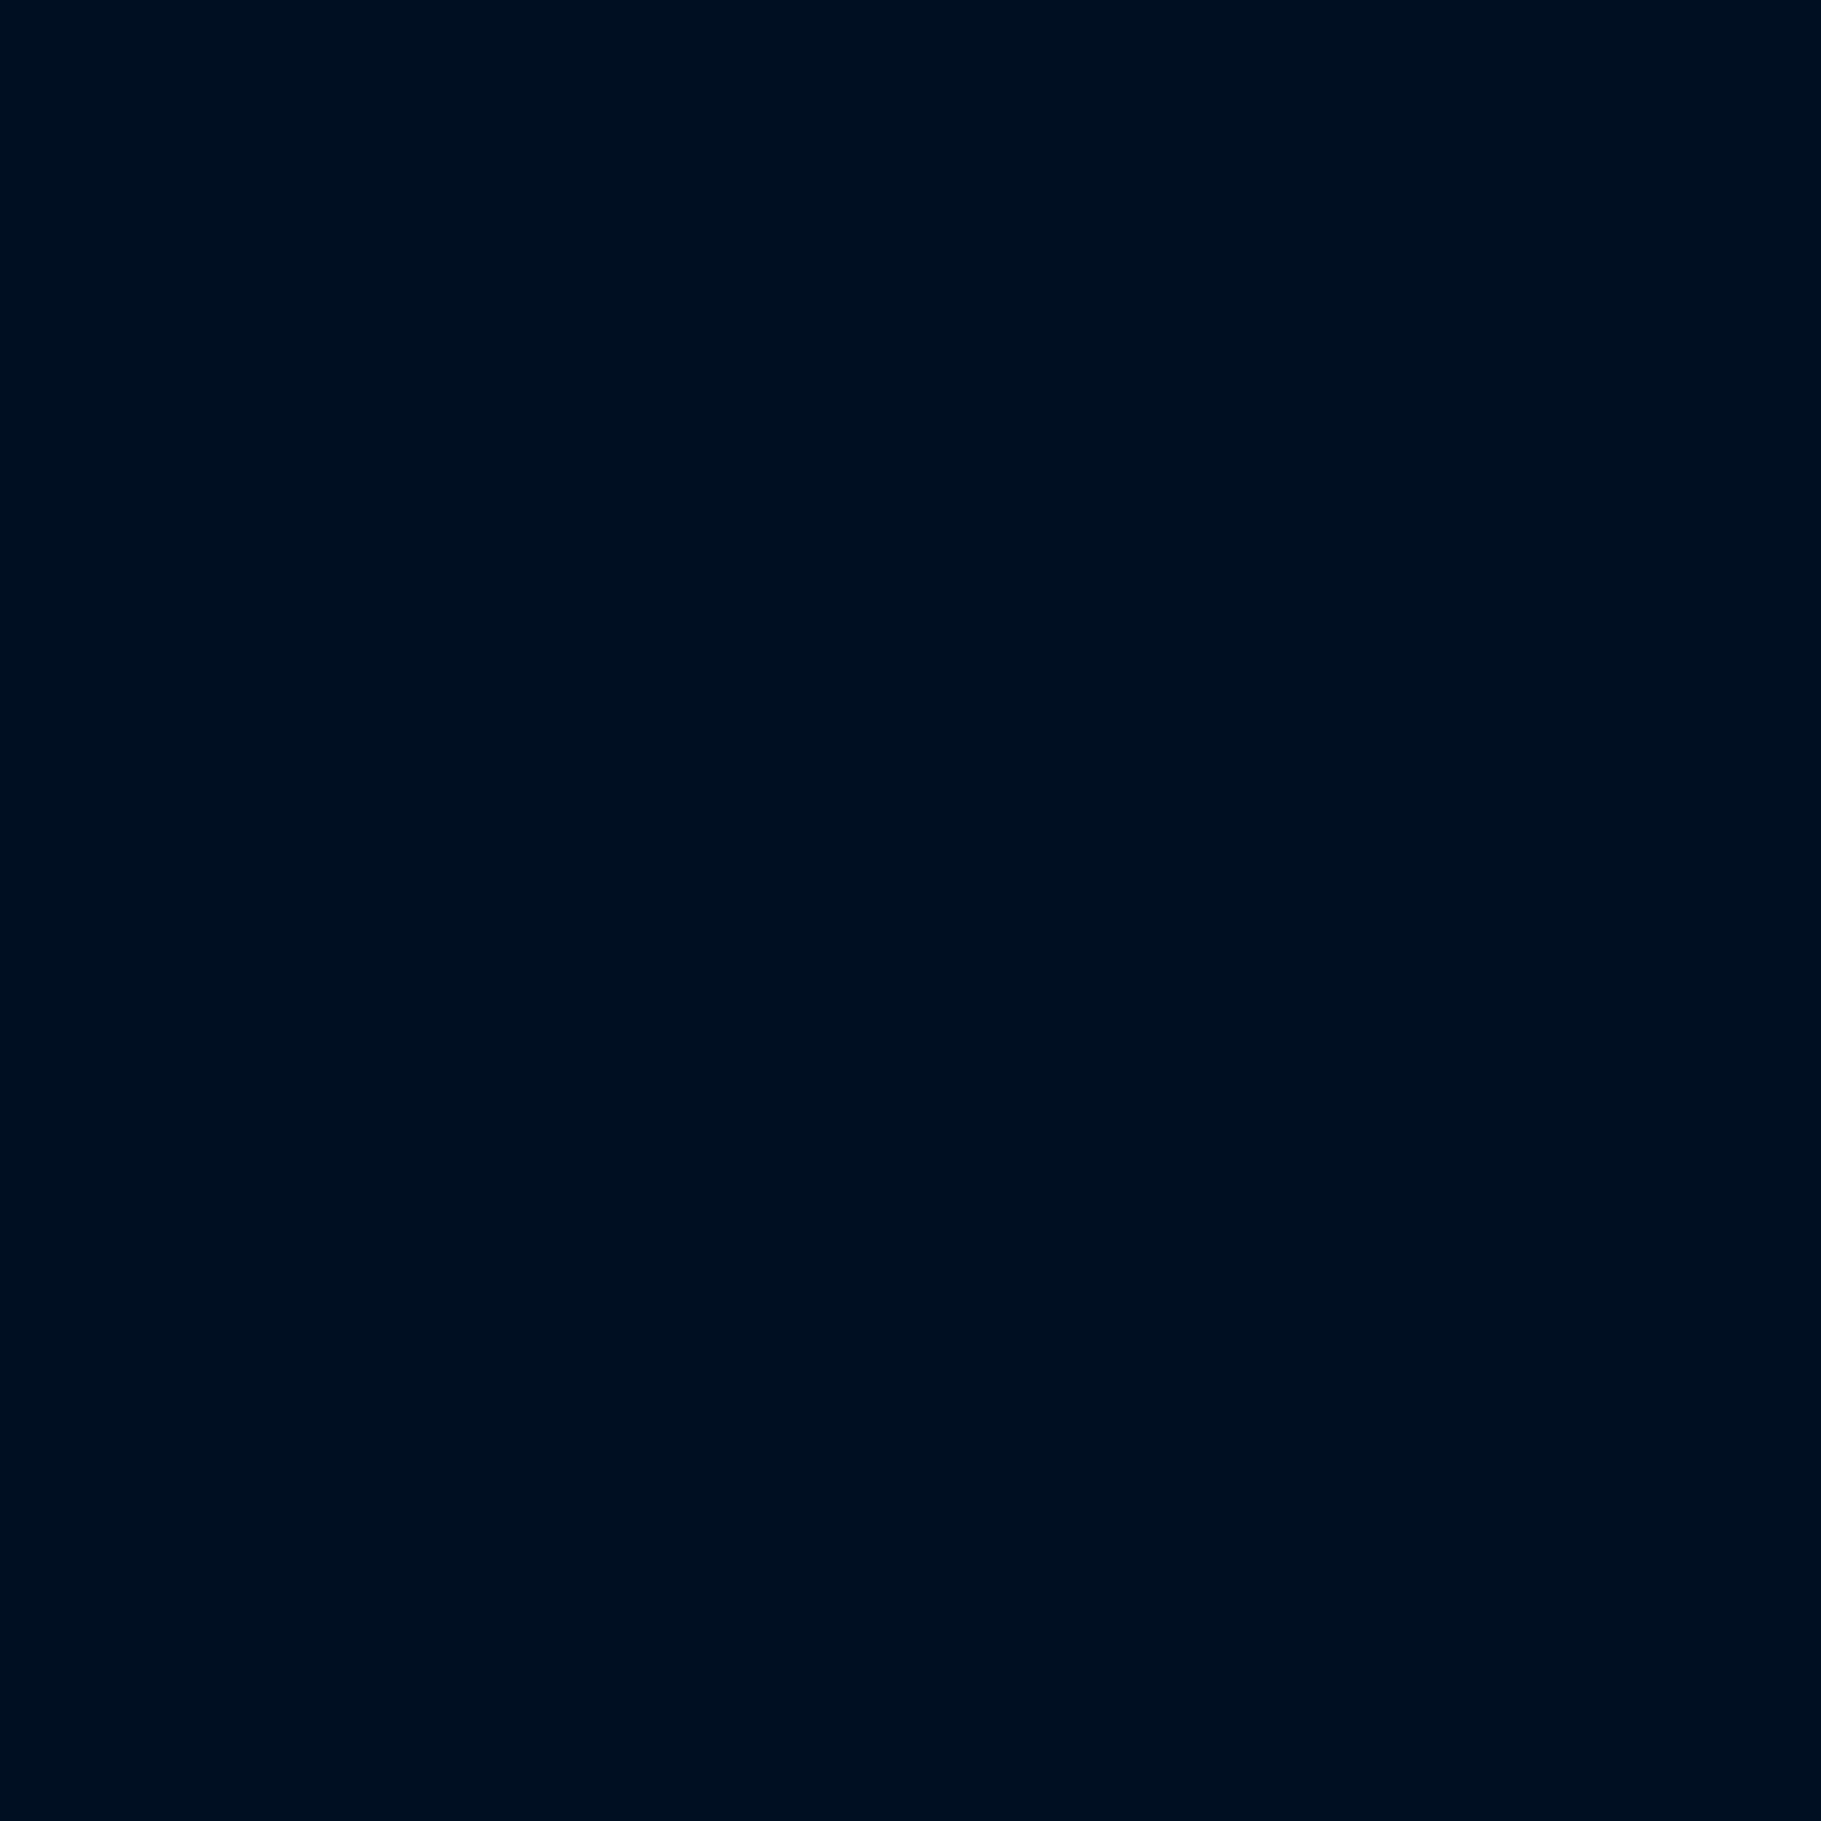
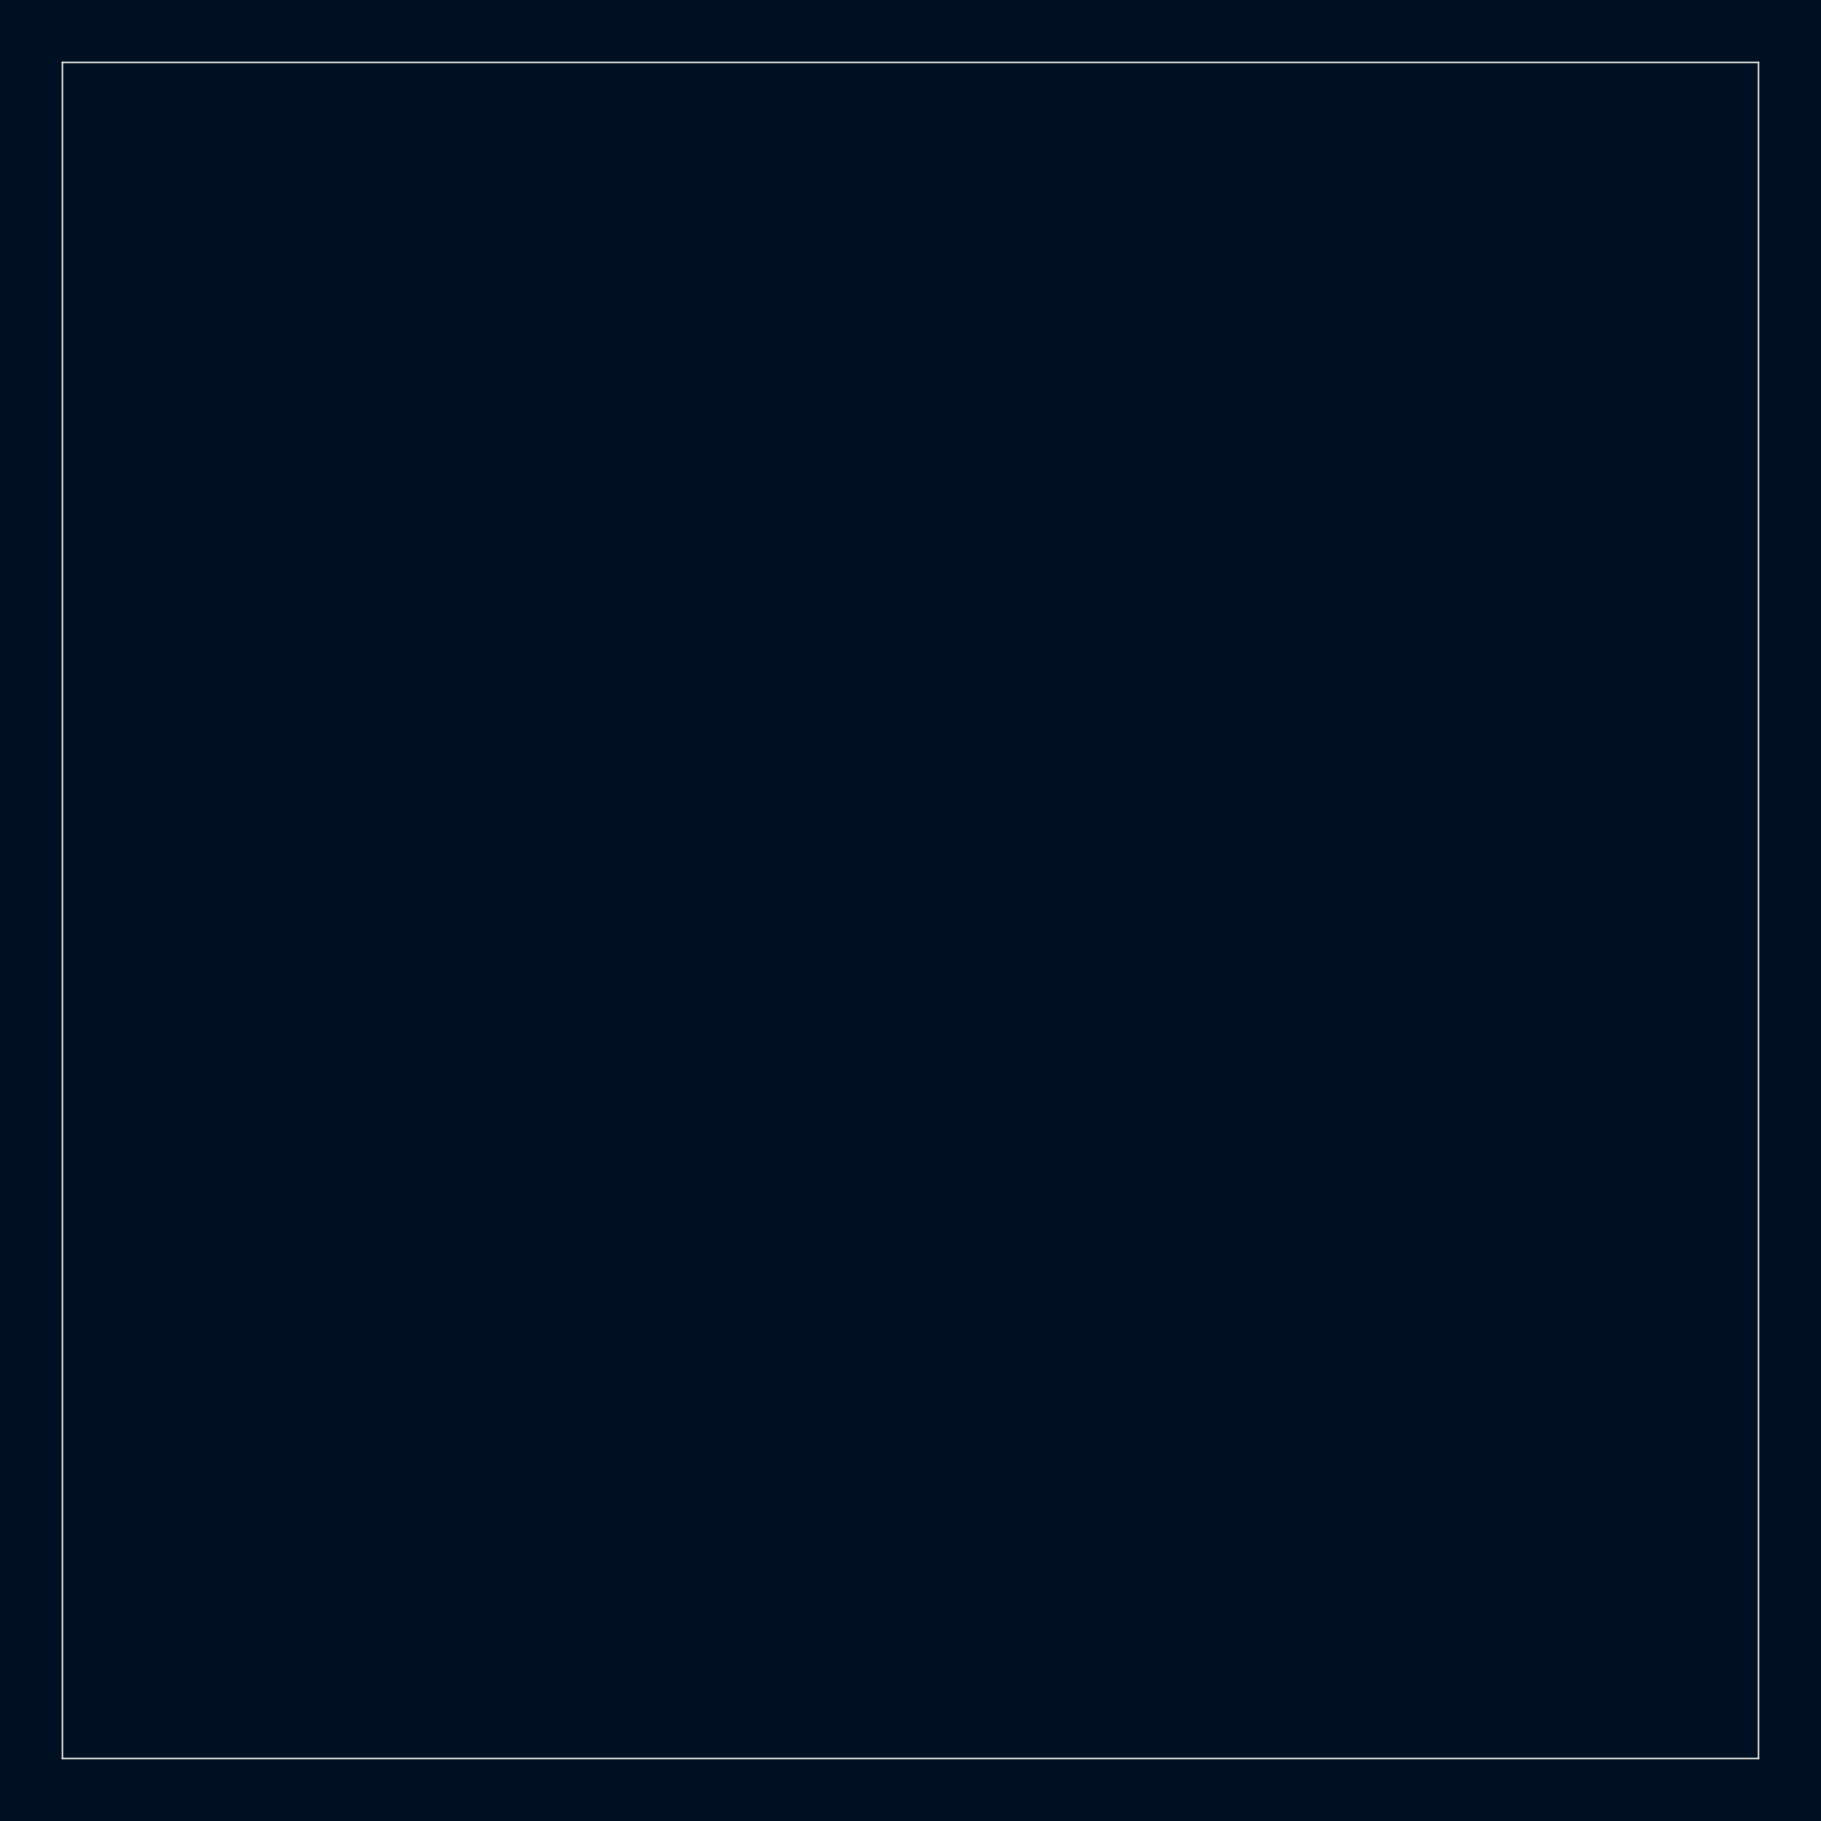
board edge: none -> (62, 62) (1758, 62) (1758, 1758) (62, 1758) (62, 62)

